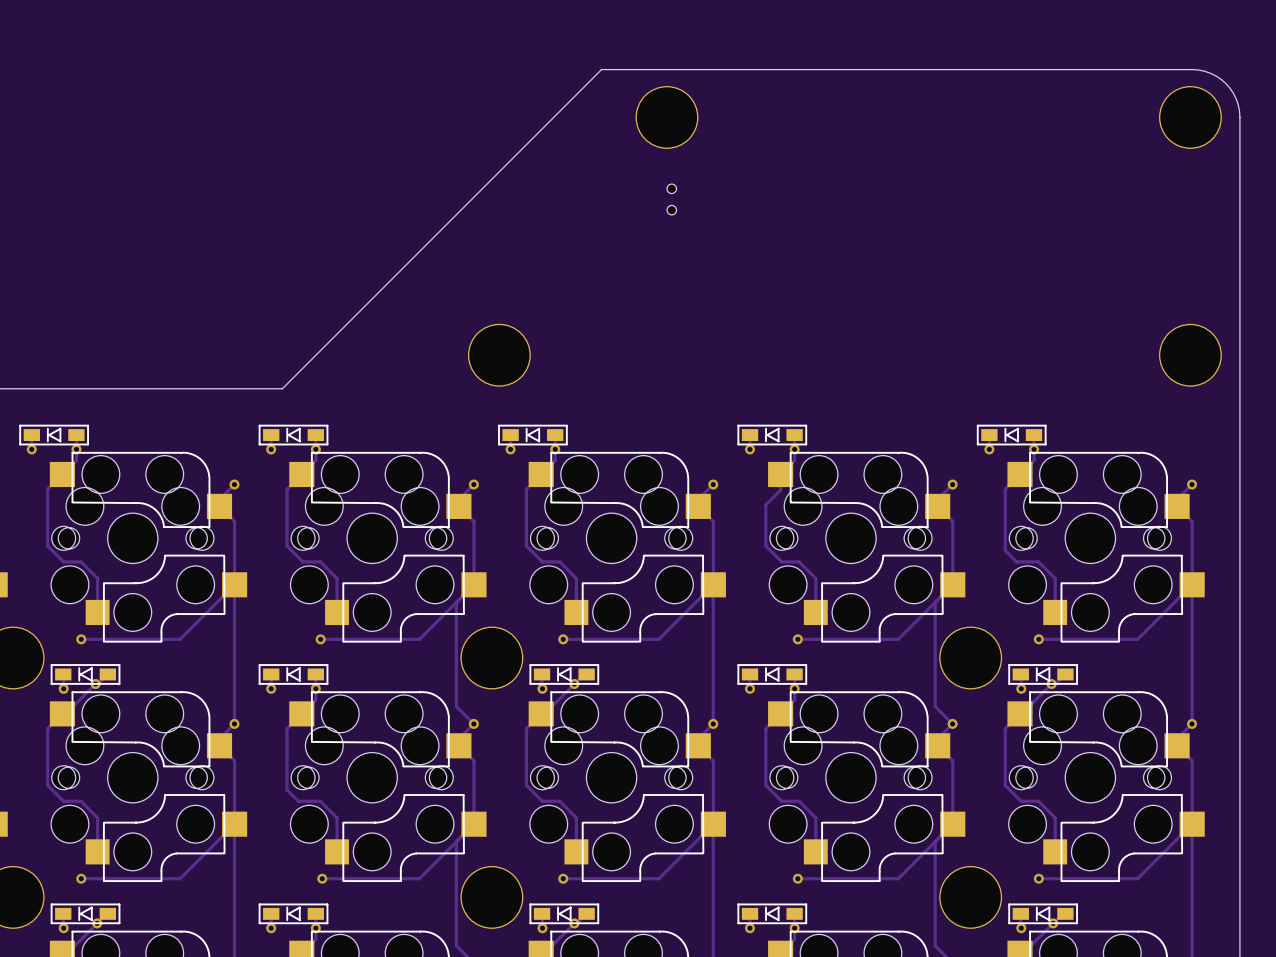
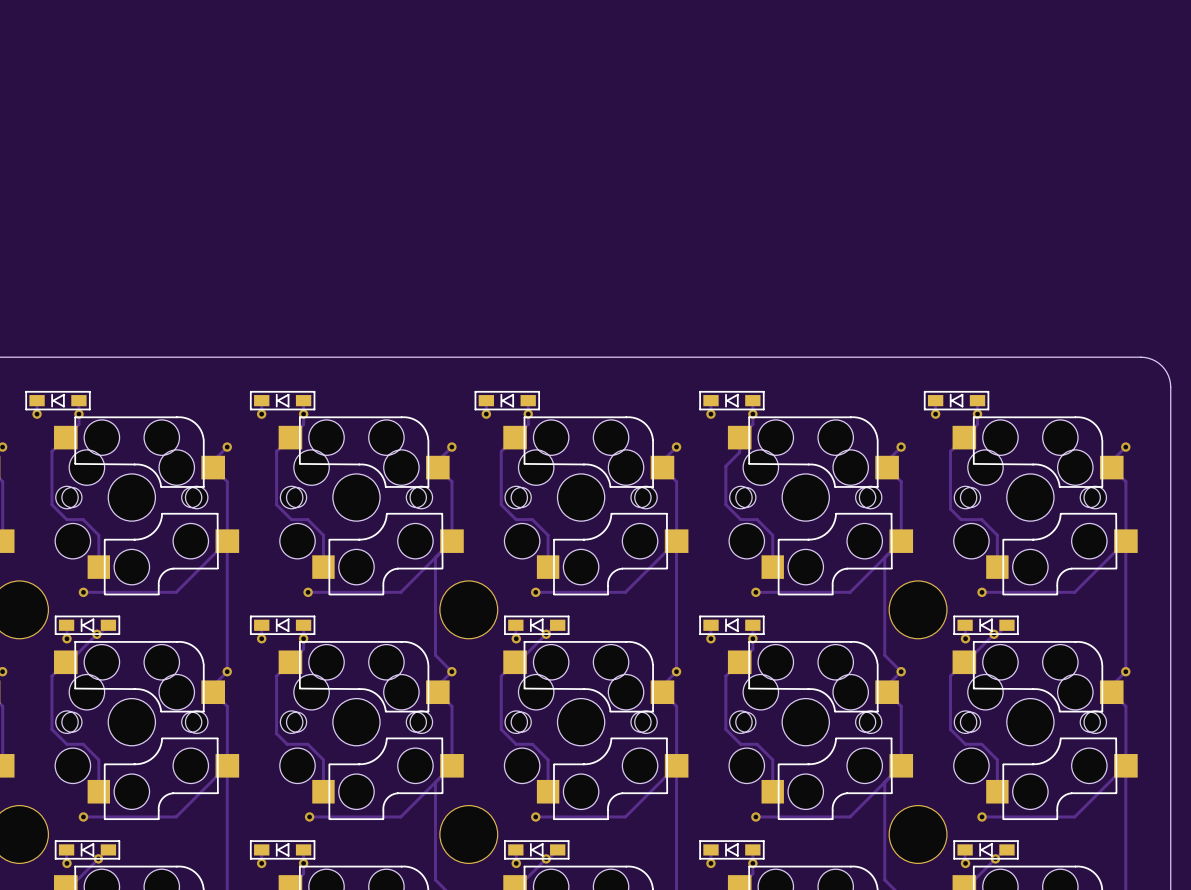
part: (666, 117) -> none
part: (1190, 117) -> none
part: (671, 199) -> none
part: (499, 355) -> none
part: (1190, 355) -> none
board edge: (282, 388) (601, 69) (1192, 69) (1210, 73) (1221, 79) (1233, 93) (1239, 111) (1239, 420) -> (272, 357) (1140, 357) (1152, 359) (1161, 365) (1168, 375) (1170, 387)

